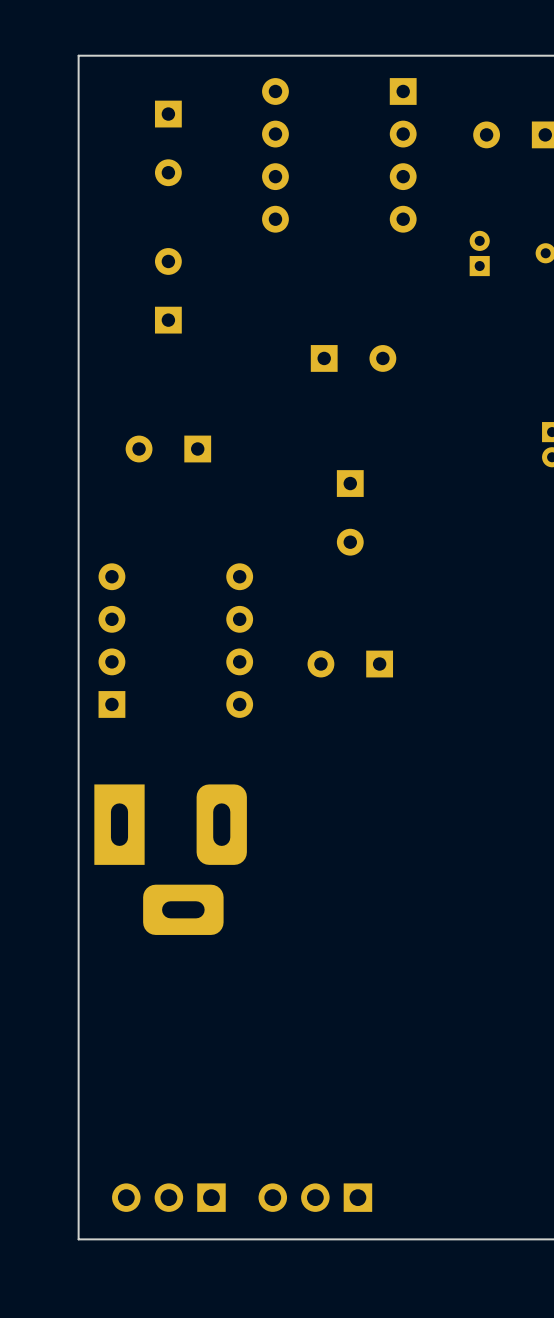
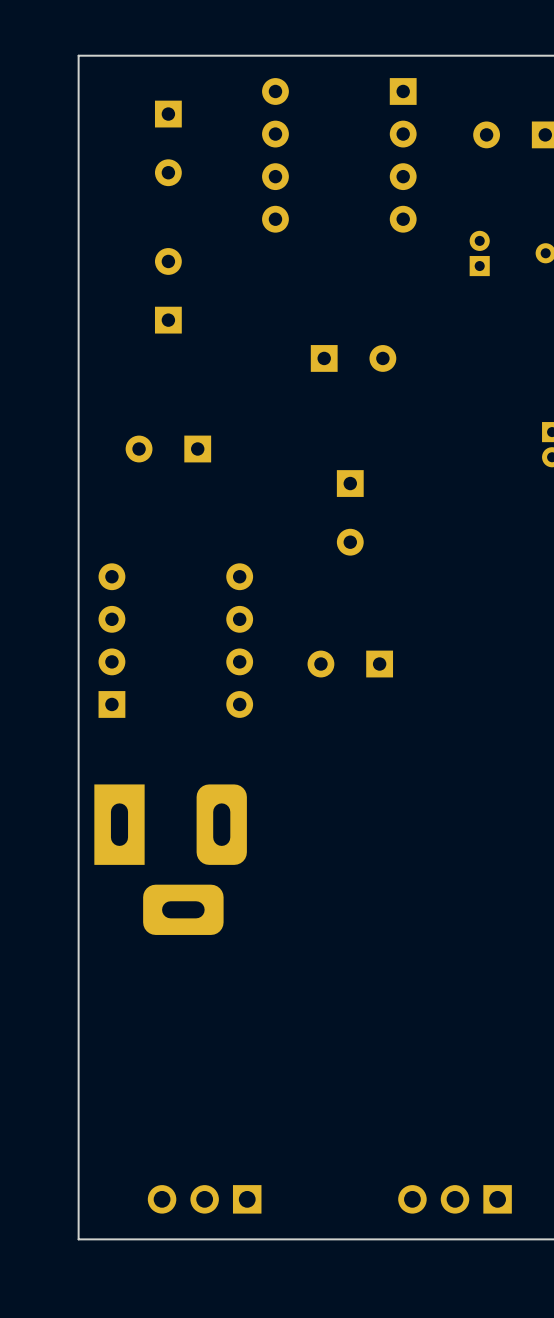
part position: (168, 1197) -> (204, 1199)
part: (315, 1197) -> none
part: none -> (455, 1199)

